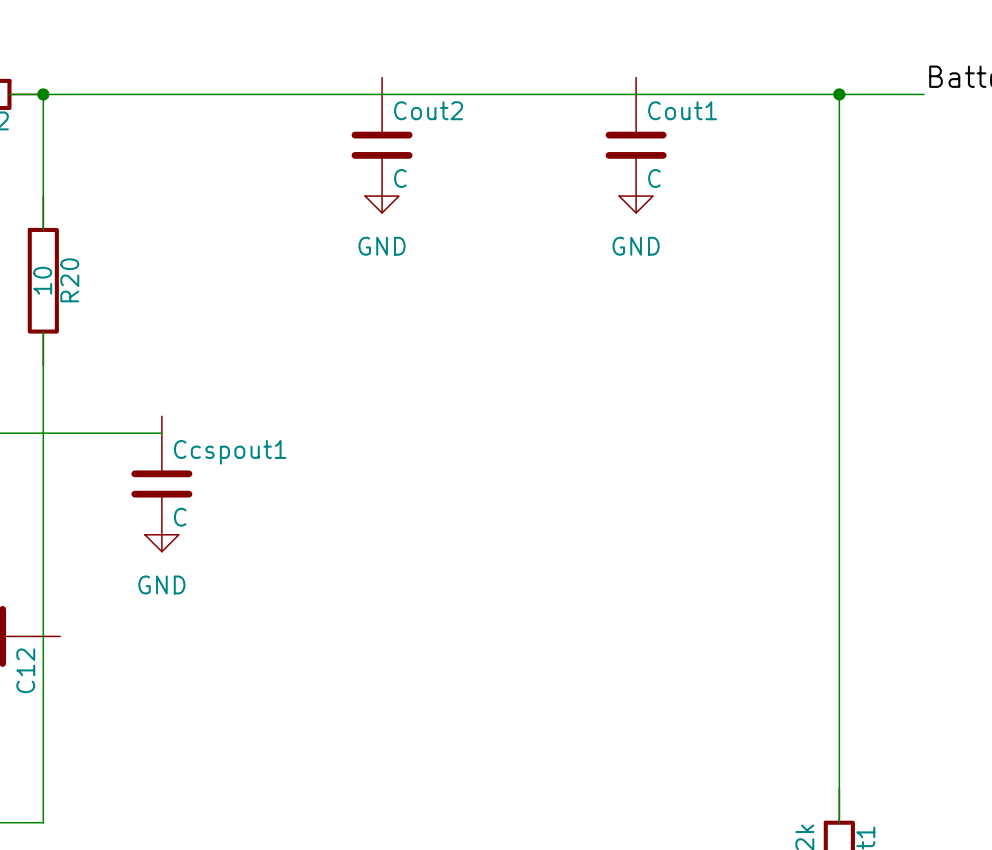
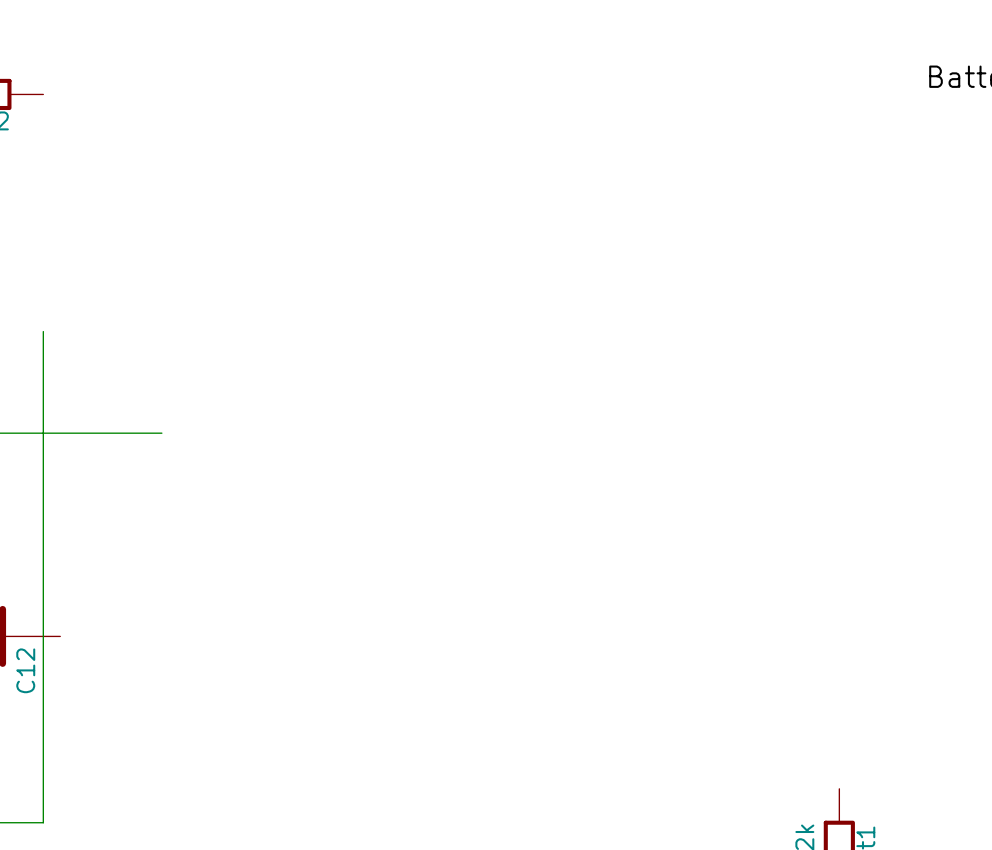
wire: (9, 94) (924, 94) -> none
wire: (43, 94) (43, 229) -> none
junction: (43, 94) -> none
wire: (839, 94) (839, 822) -> none
junction: (839, 94) -> none
Cout2: C (382, 145) -> none
Cout1: C (636, 145) -> none
power symbol: GND (382, 204) -> none
power symbol: GND (636, 204) -> none
R20: 10 (43, 280) -> none
Ccspout1: C (161, 483) -> none
power symbol: GND (161, 543) -> none

